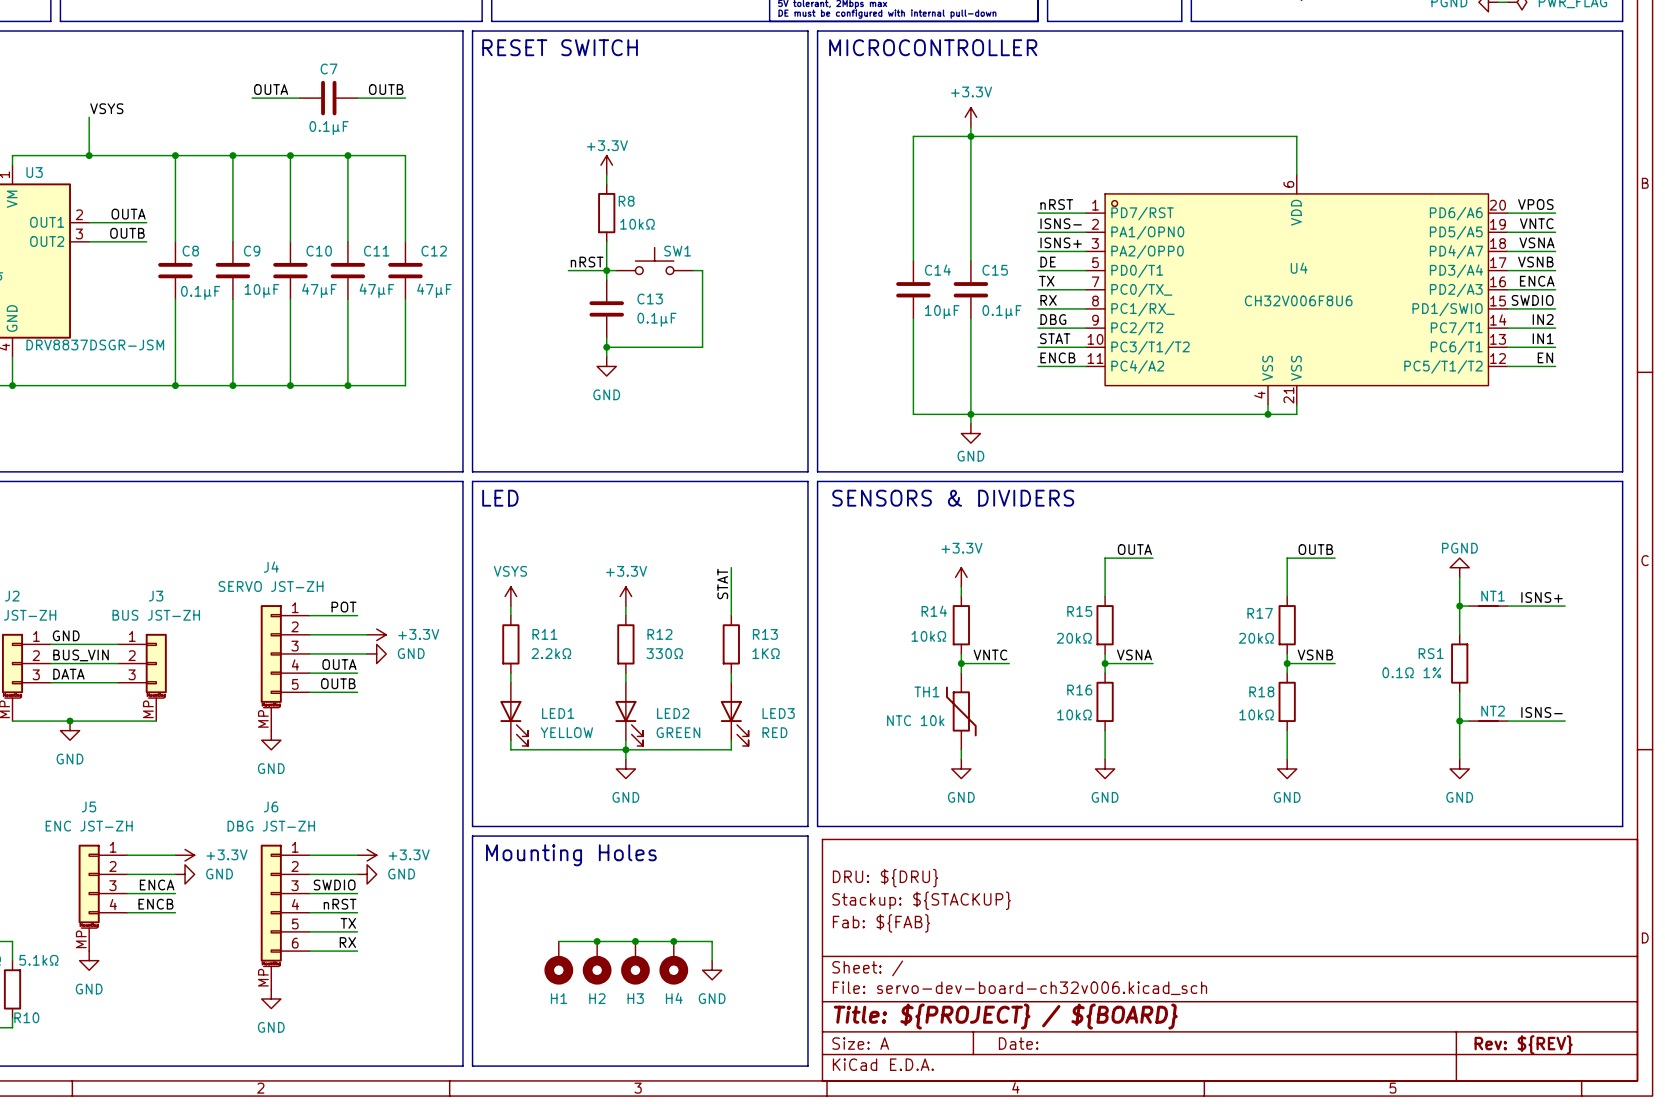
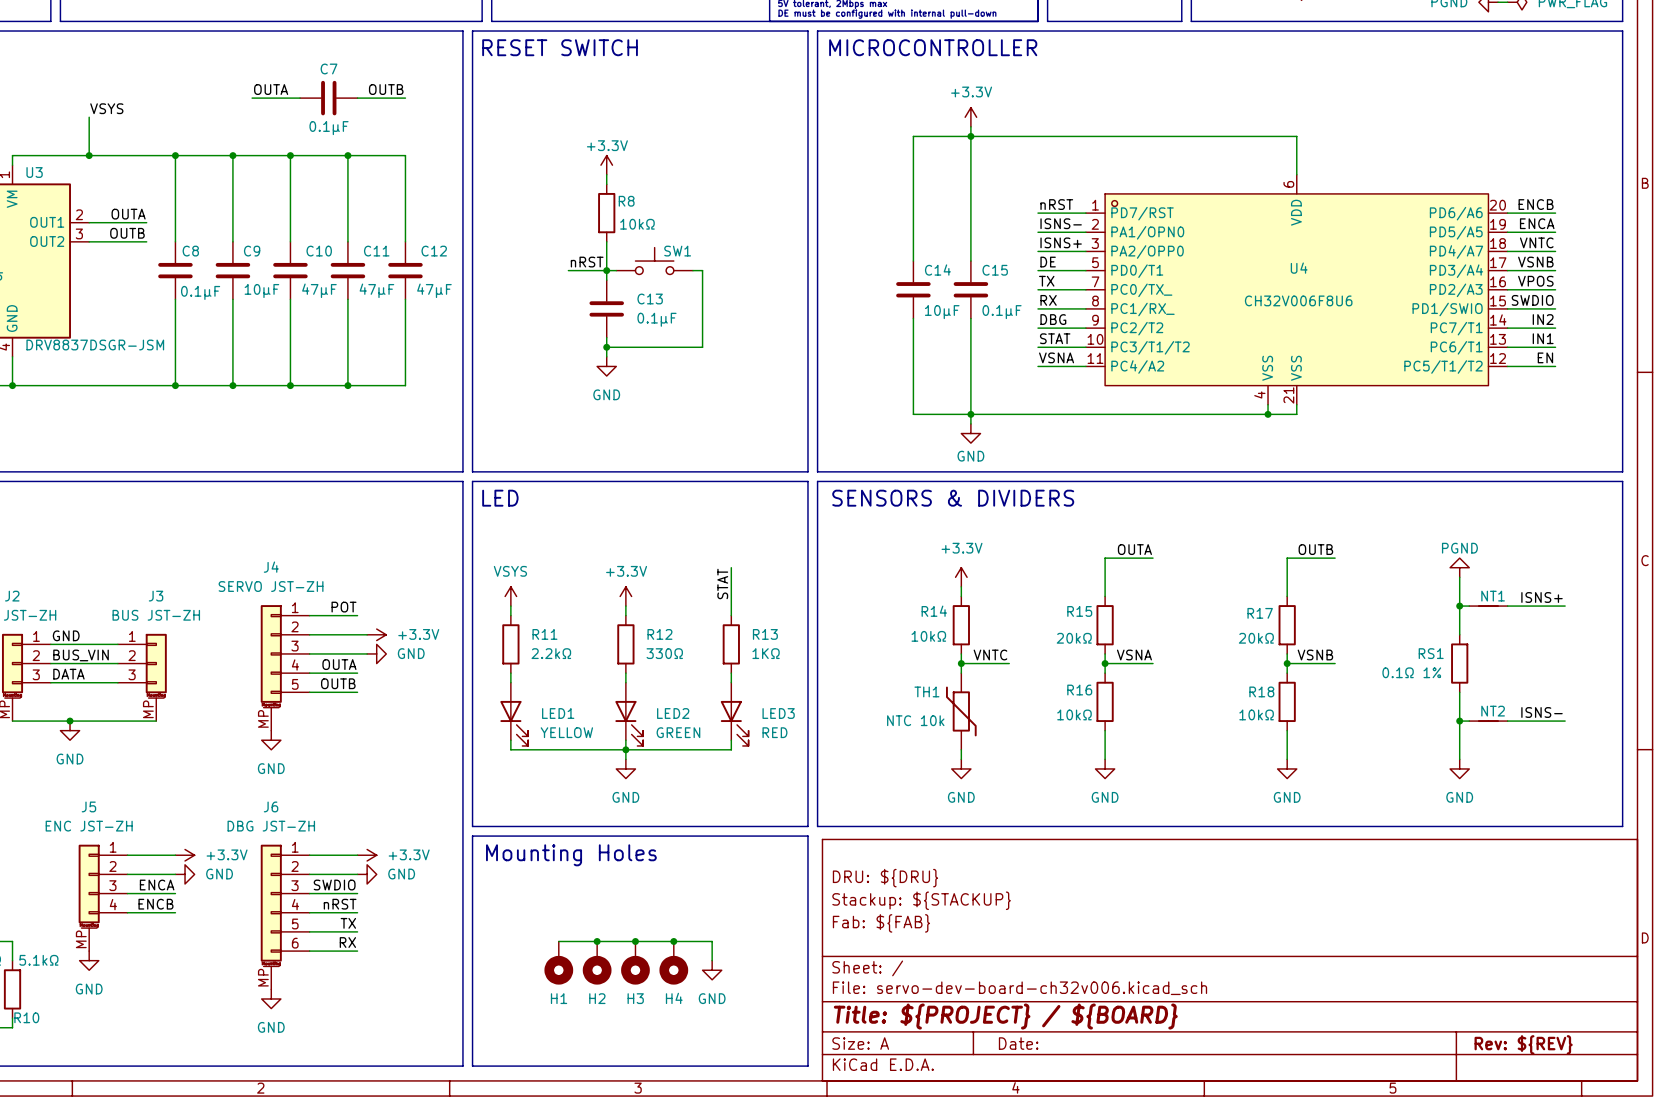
label: VPOS (1535, 204) -> ENCB (1536, 204)
label: VNTC (1536, 223) -> ENCA (1537, 223)
label: VSNA (1536, 242) -> VNTC (1536, 242)
label: ENCA (1537, 281) -> VPOS (1535, 281)
label: ENCB (1057, 357) -> VSNA (1056, 357)

